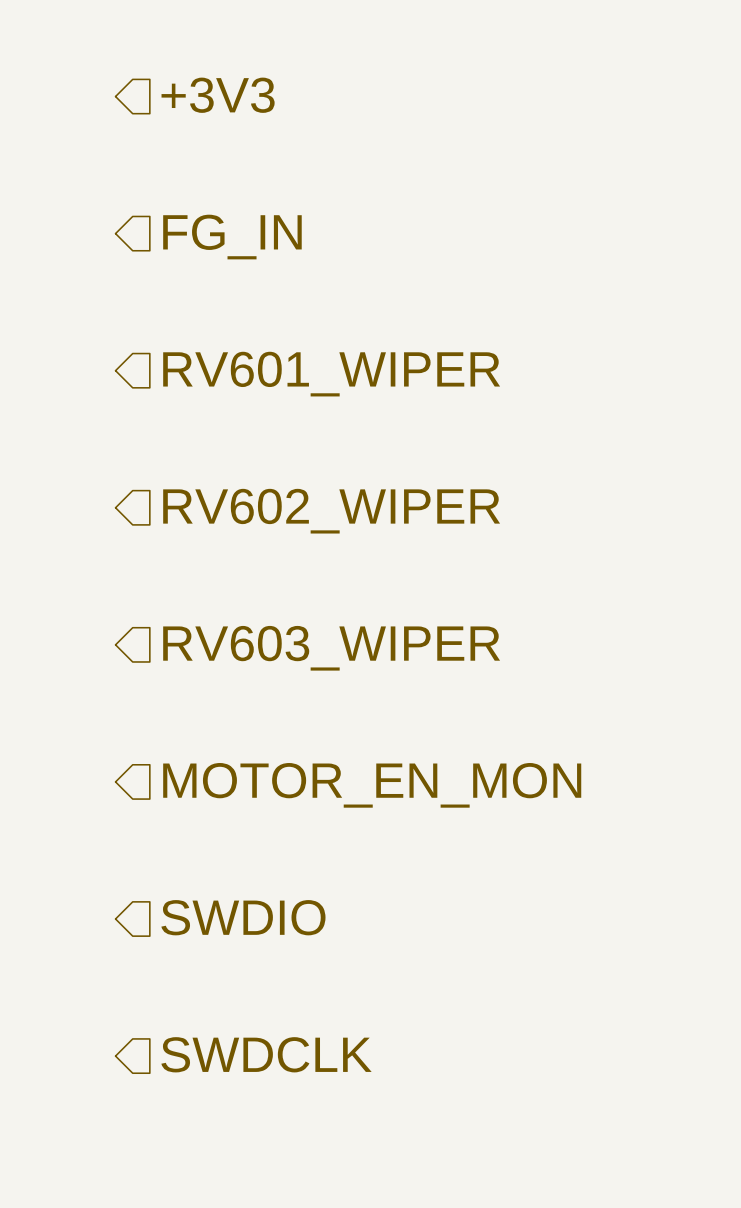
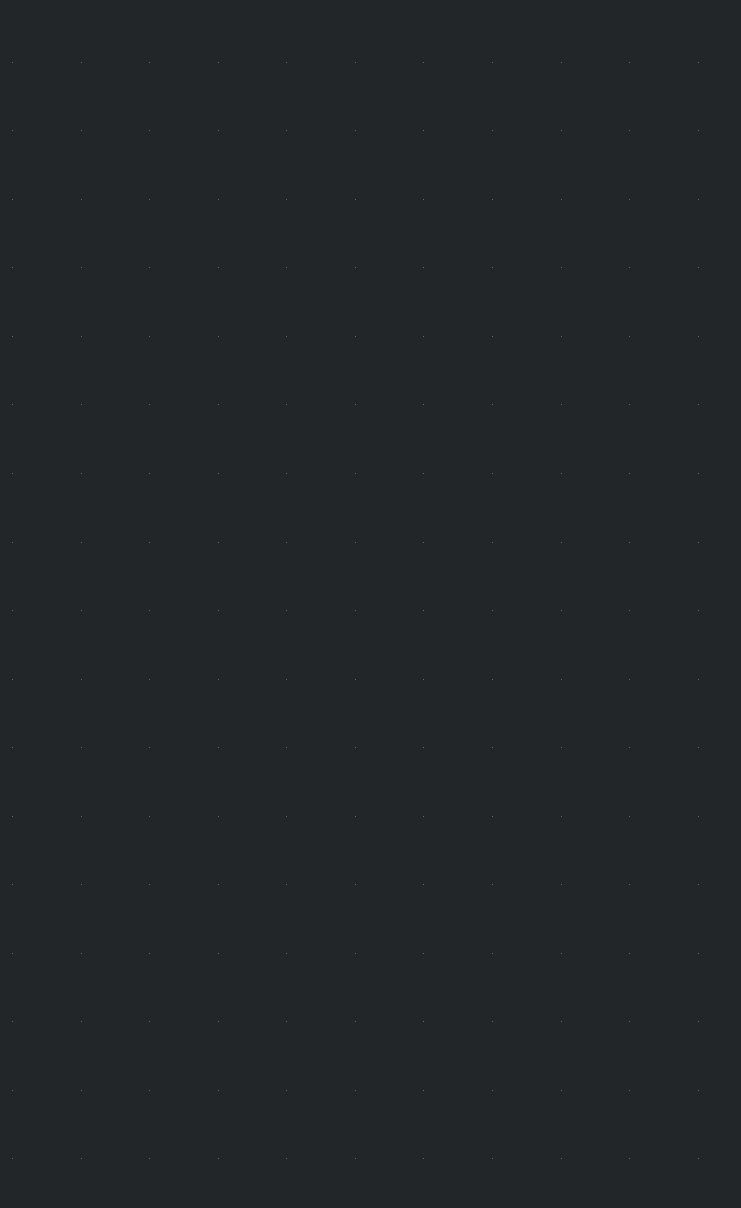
hierarchical label: +3V3 (218, 95) -> none
hierarchical label: FG_IN (232, 237) -> none
hierarchical label: RV601_WIPER (331, 374) -> none
hierarchical label: RV602_WIPER (331, 511) -> none
hierarchical label: RV603_WIPER (331, 648) -> none
hierarchical label: MOTOR_EN_MON (372, 785) -> none
hierarchical label: SWDIO (243, 917) -> none
hierarchical label: SWDCLK (266, 1054) -> none

